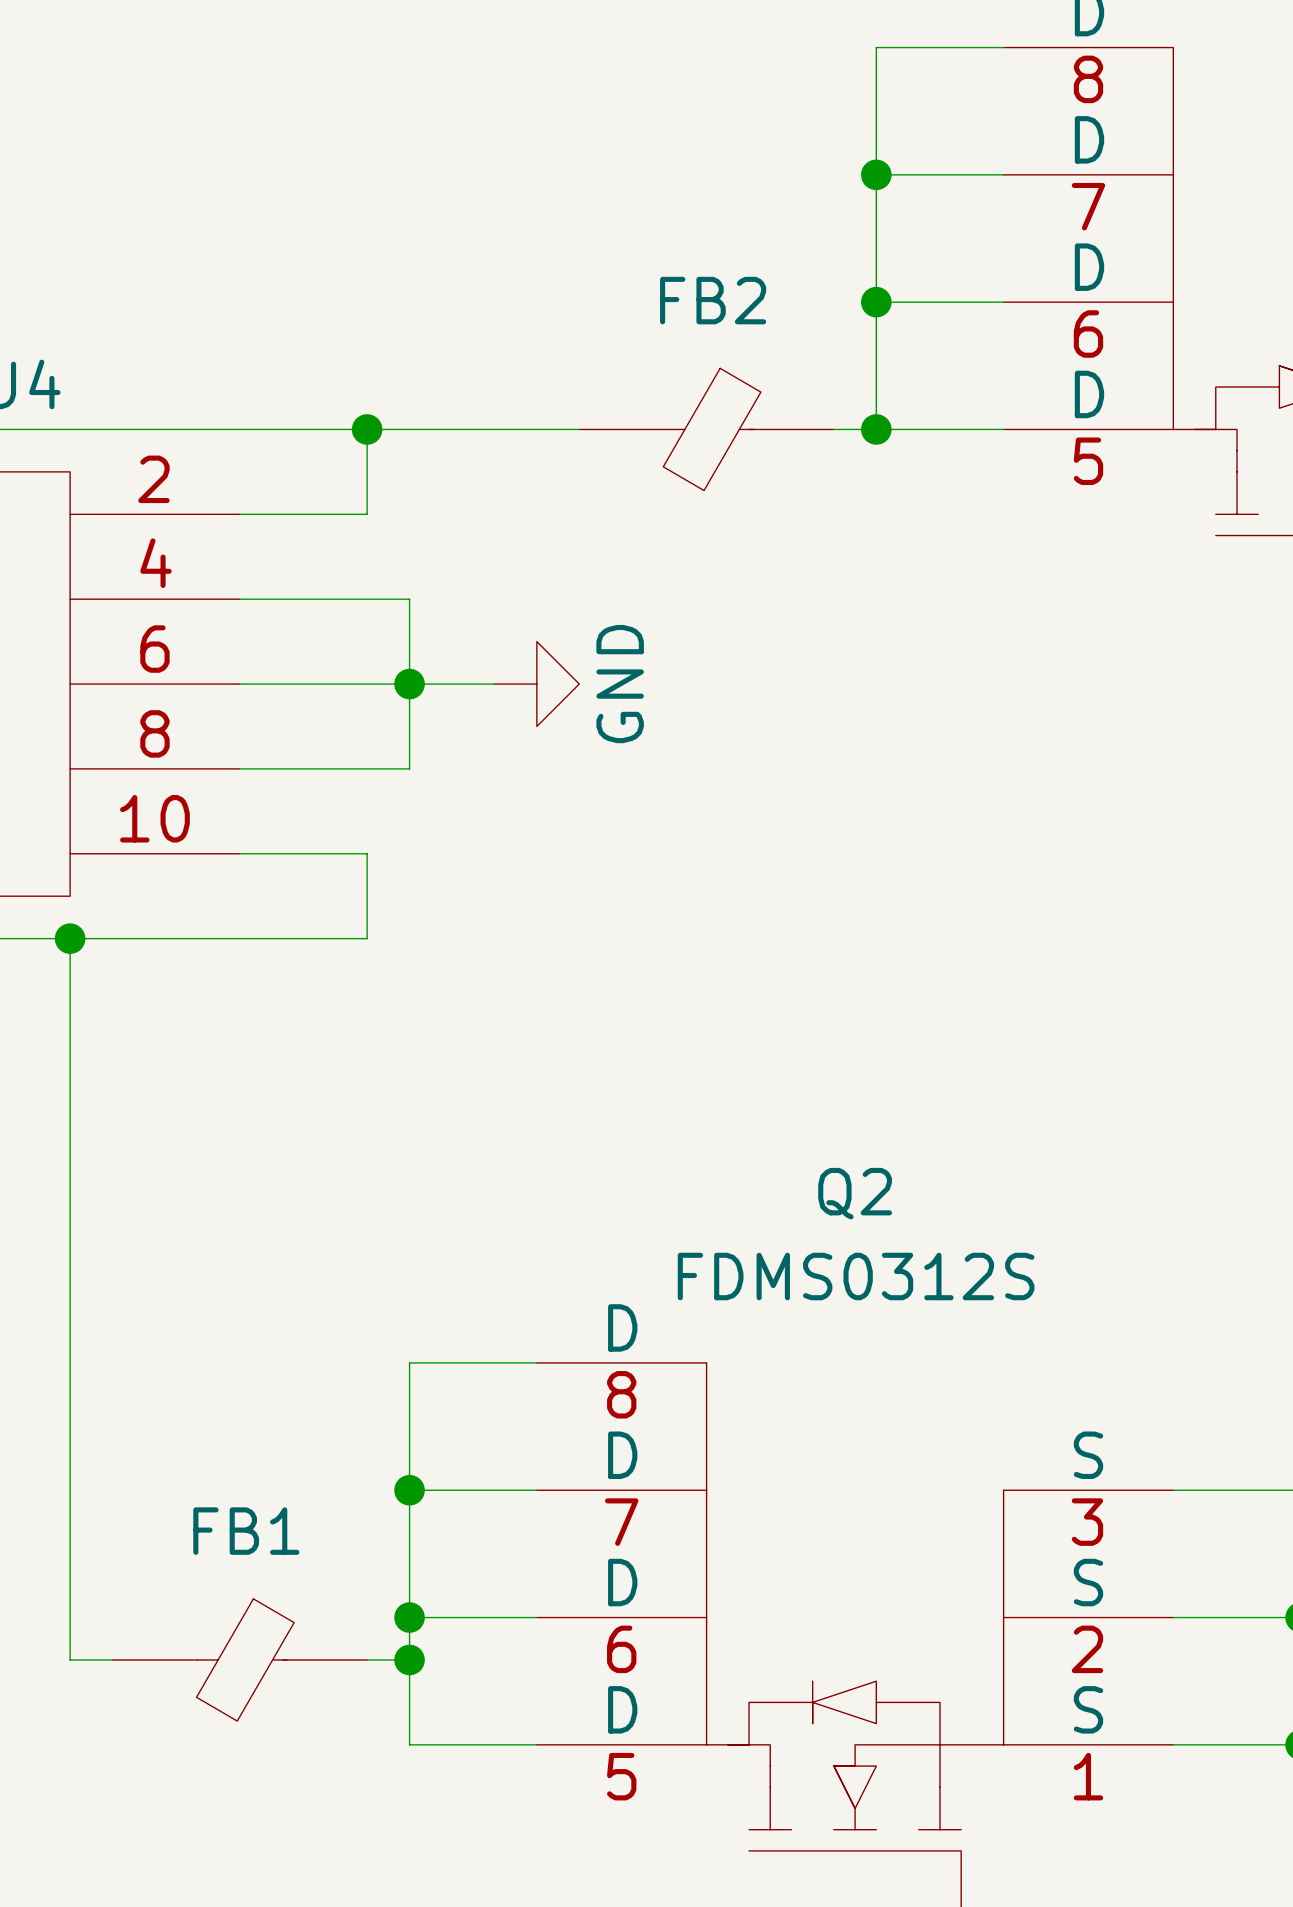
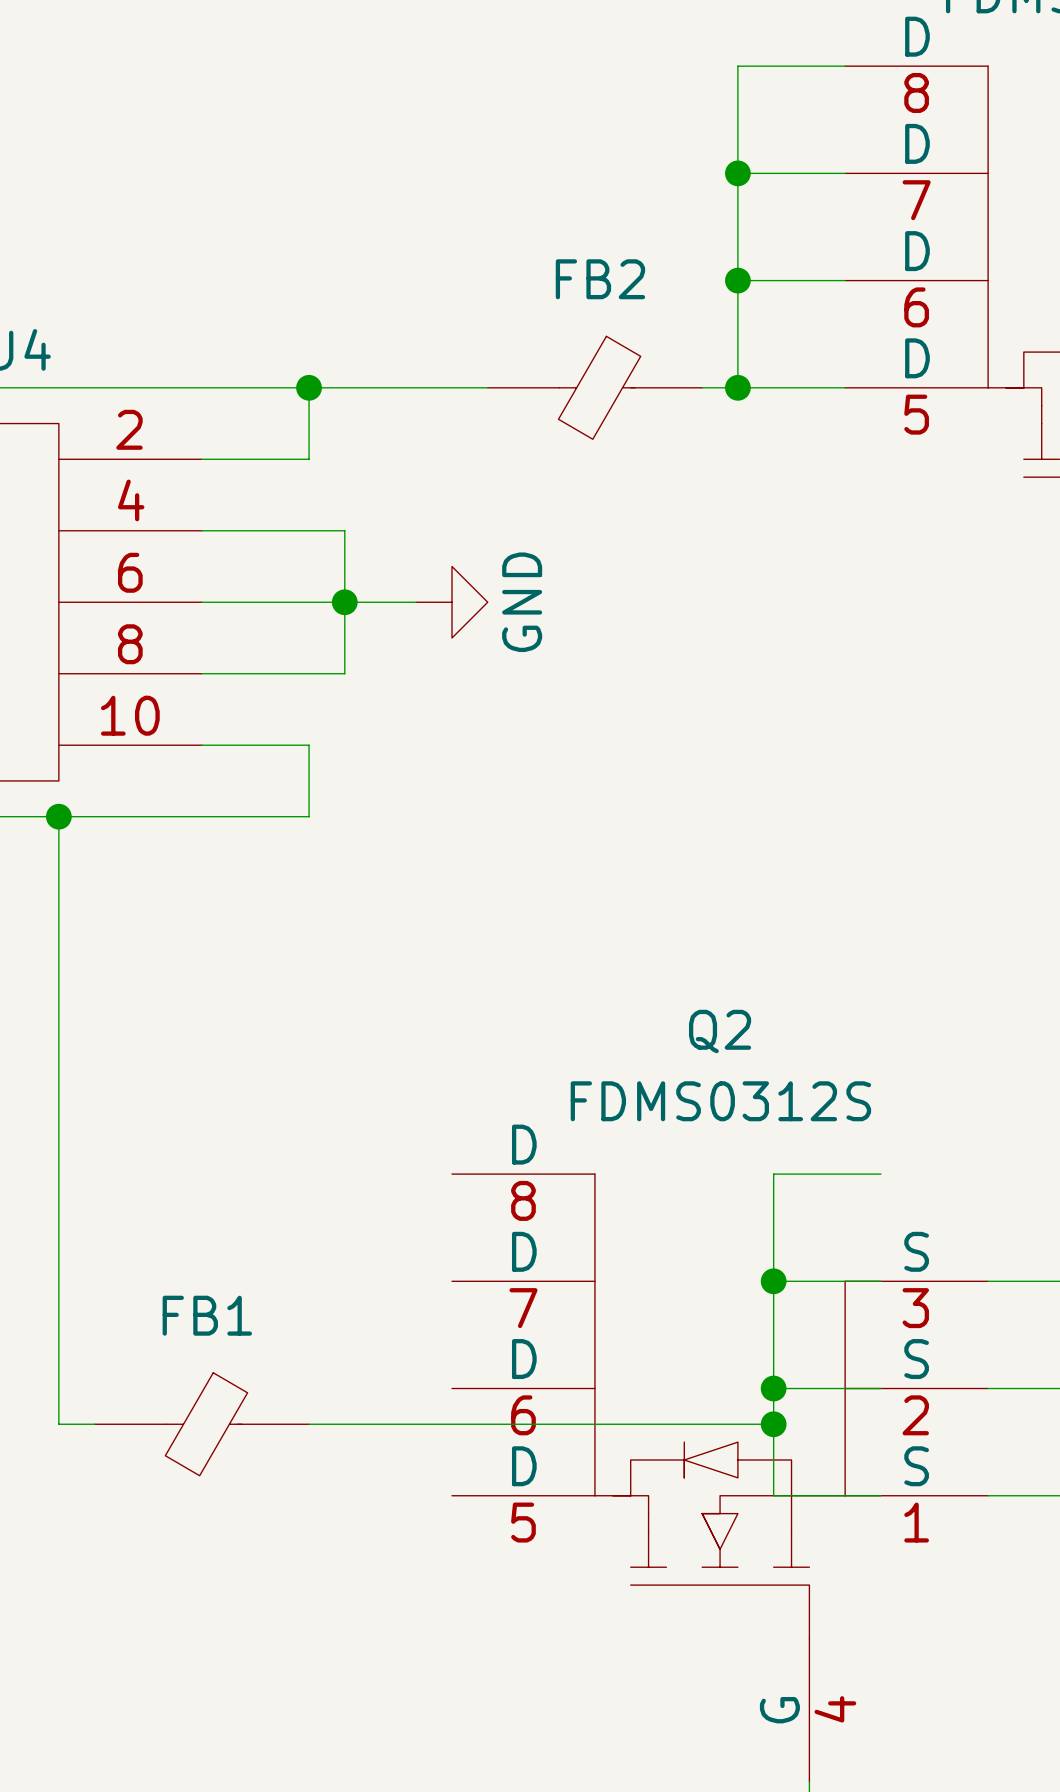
wire: (536, 1362) (409, 1362) (409, 1744) (536, 1744) -> (880, 1174) (773, 1174) (773, 1495) (880, 1495)
wire: (409, 1490) (536, 1490) -> (773, 1281) (880, 1281)
junction: (409, 1490) -> none
junction: none -> (773, 1281)
wire: (409, 1617) (536, 1617) -> (773, 1388) (880, 1388)
junction: (409, 1617) -> none
junction: none -> (773, 1388)
wire: none -> (344, 1424) (773, 1424)
junction: (409, 1659) -> none
junction: none -> (773, 1424)

